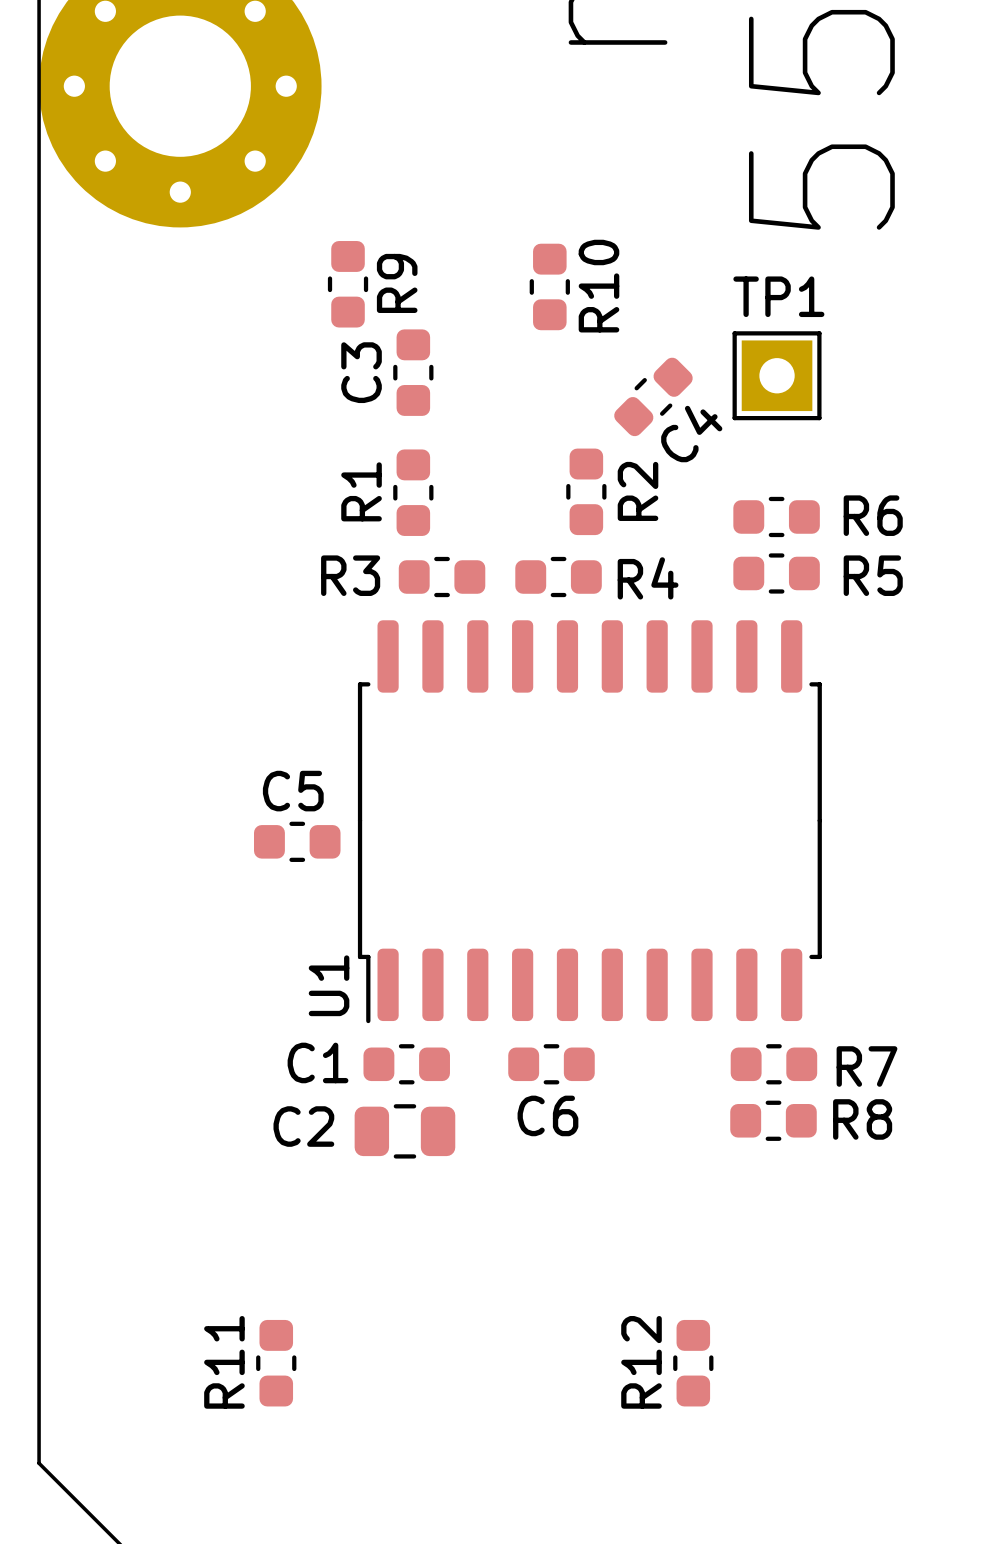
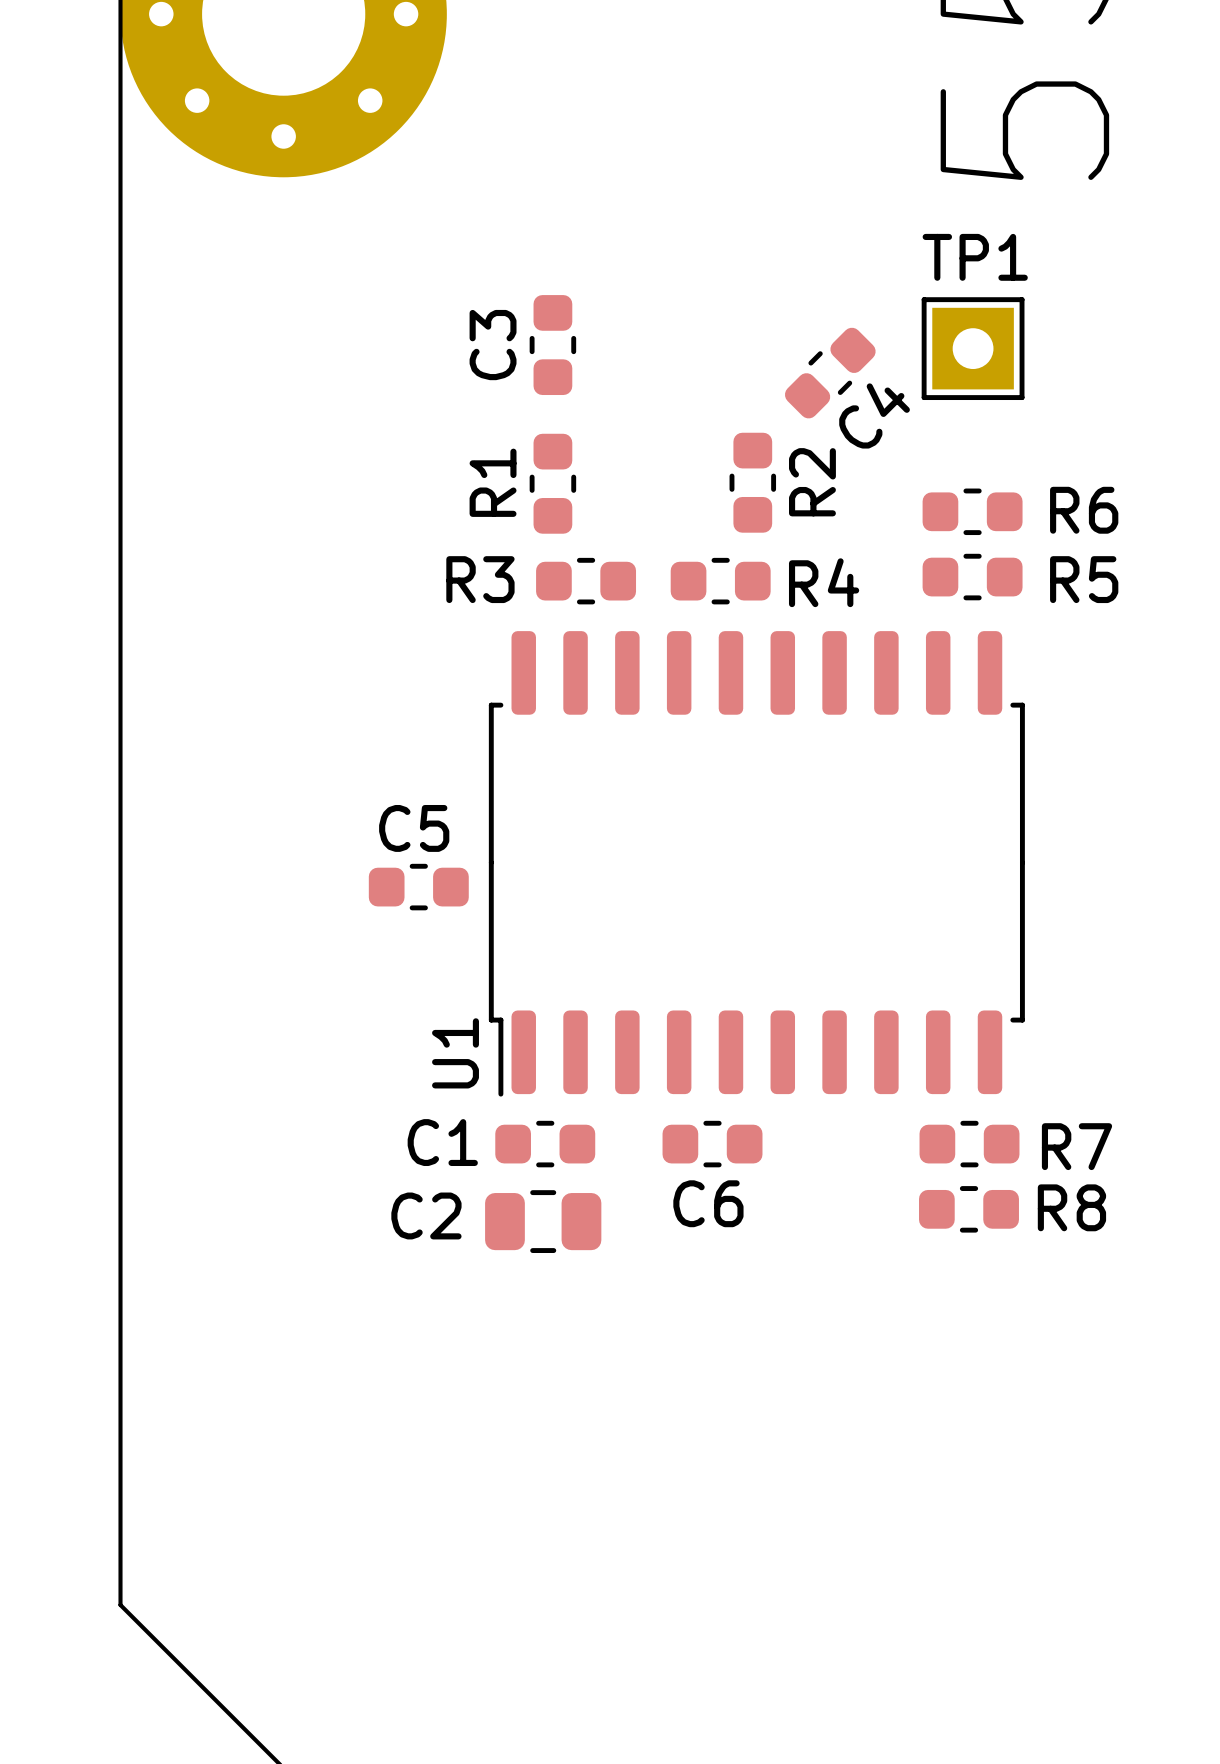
R9: (348, 284) -> none
R10: (549, 286) -> none
R11: (276, 1363) -> none
R12: (693, 1363) -> none

